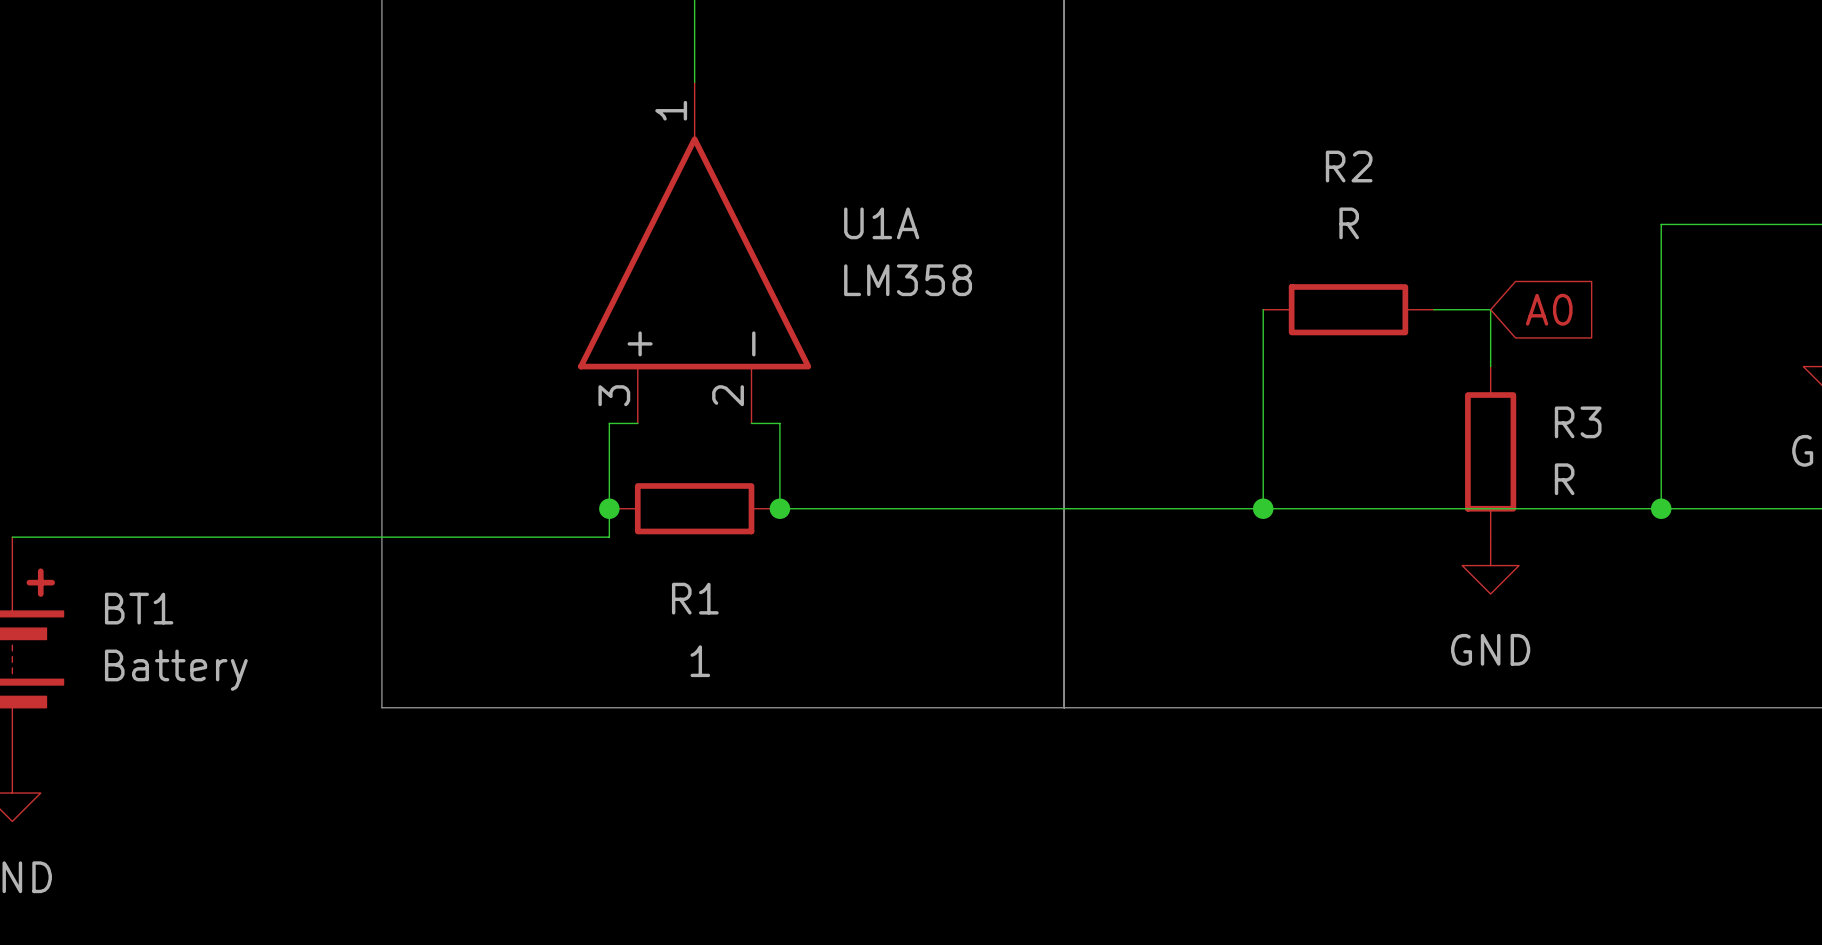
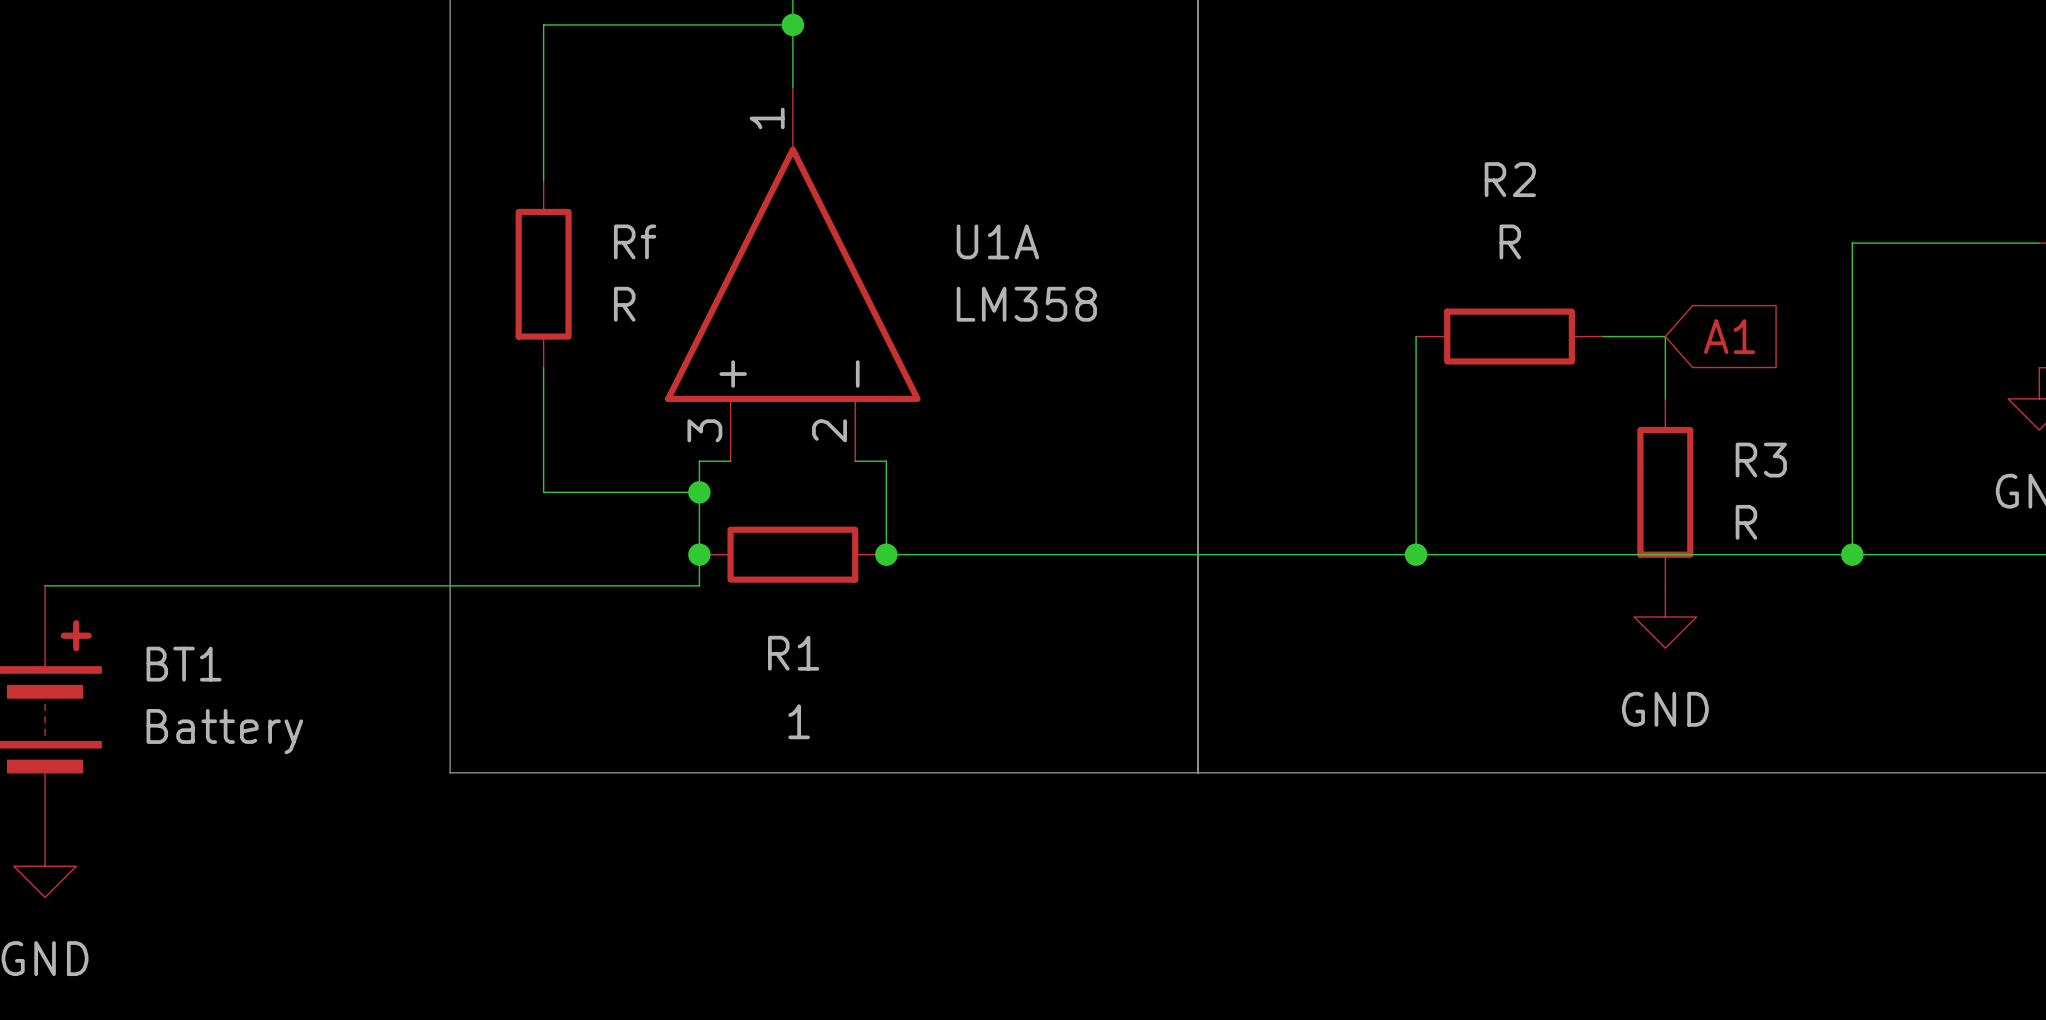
wire: none -> (792, 24) (543, 24) (543, 180)
junction: none -> (792, 24)
Rf: none -> R (543, 274)
global label: A0 (1549, 309) -> A1 (1729, 336)
wire: none -> (543, 367) (543, 492) (699, 492)
junction: none -> (699, 492)

